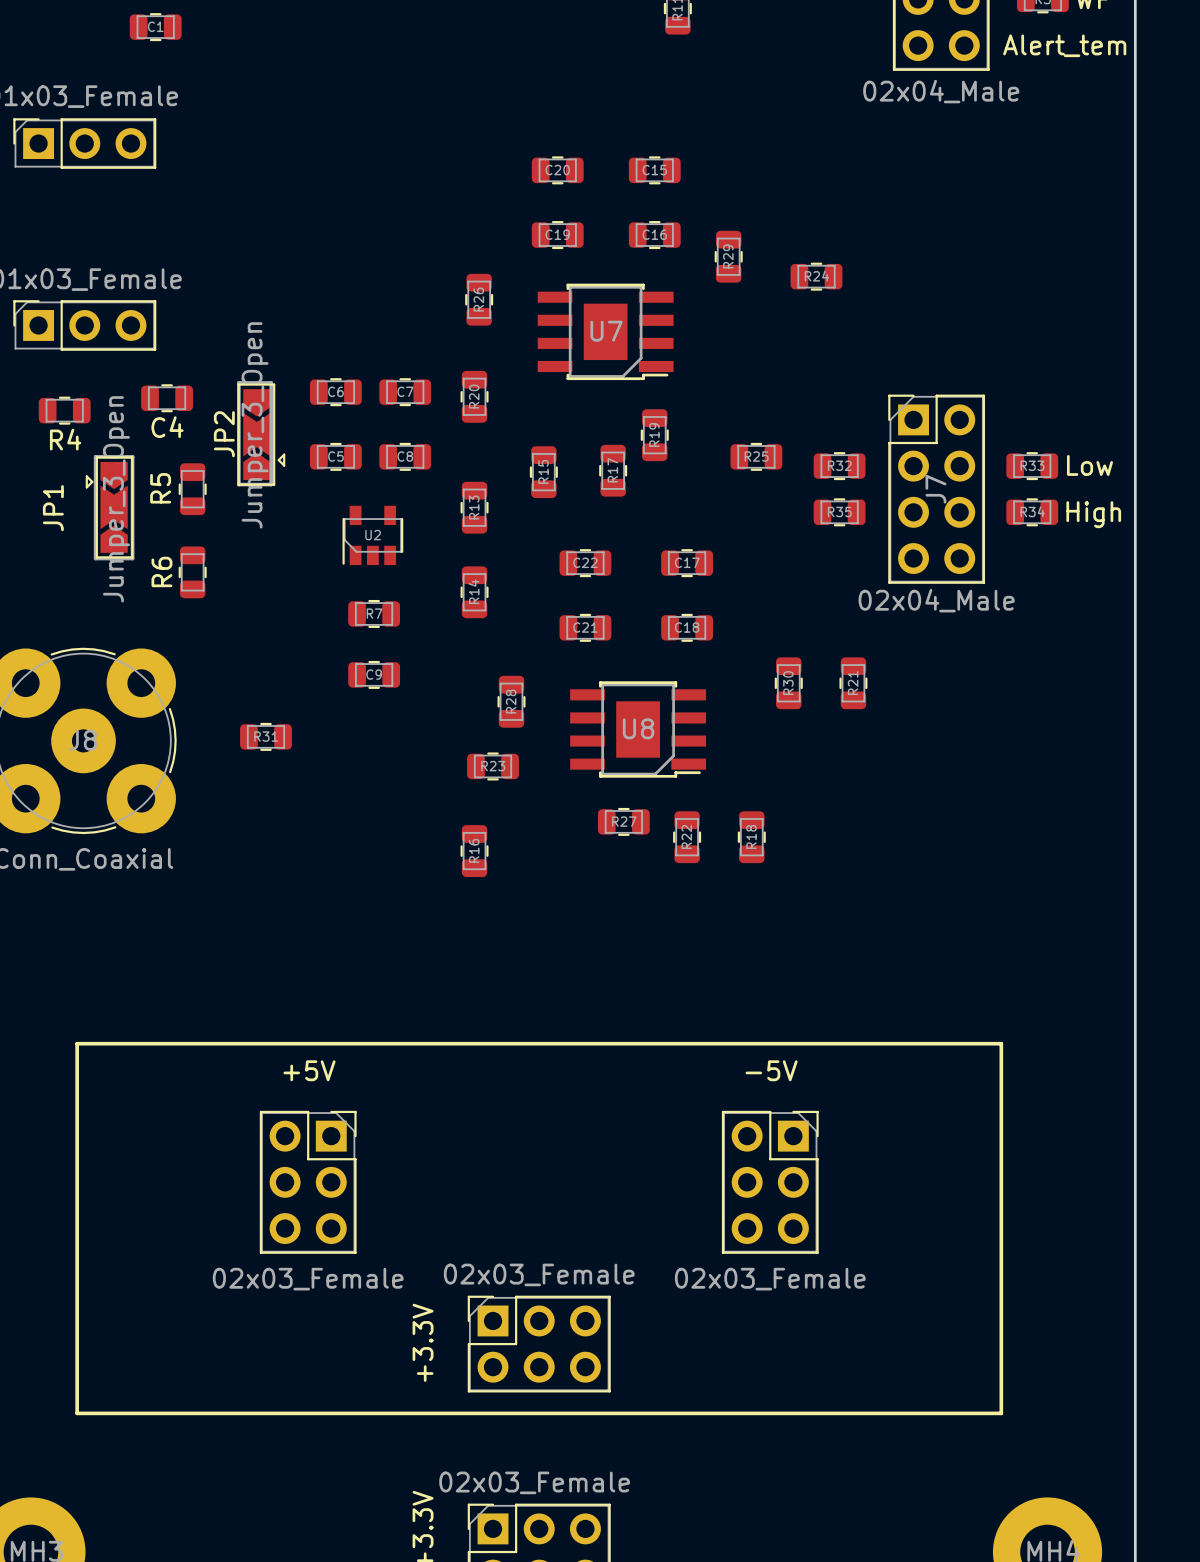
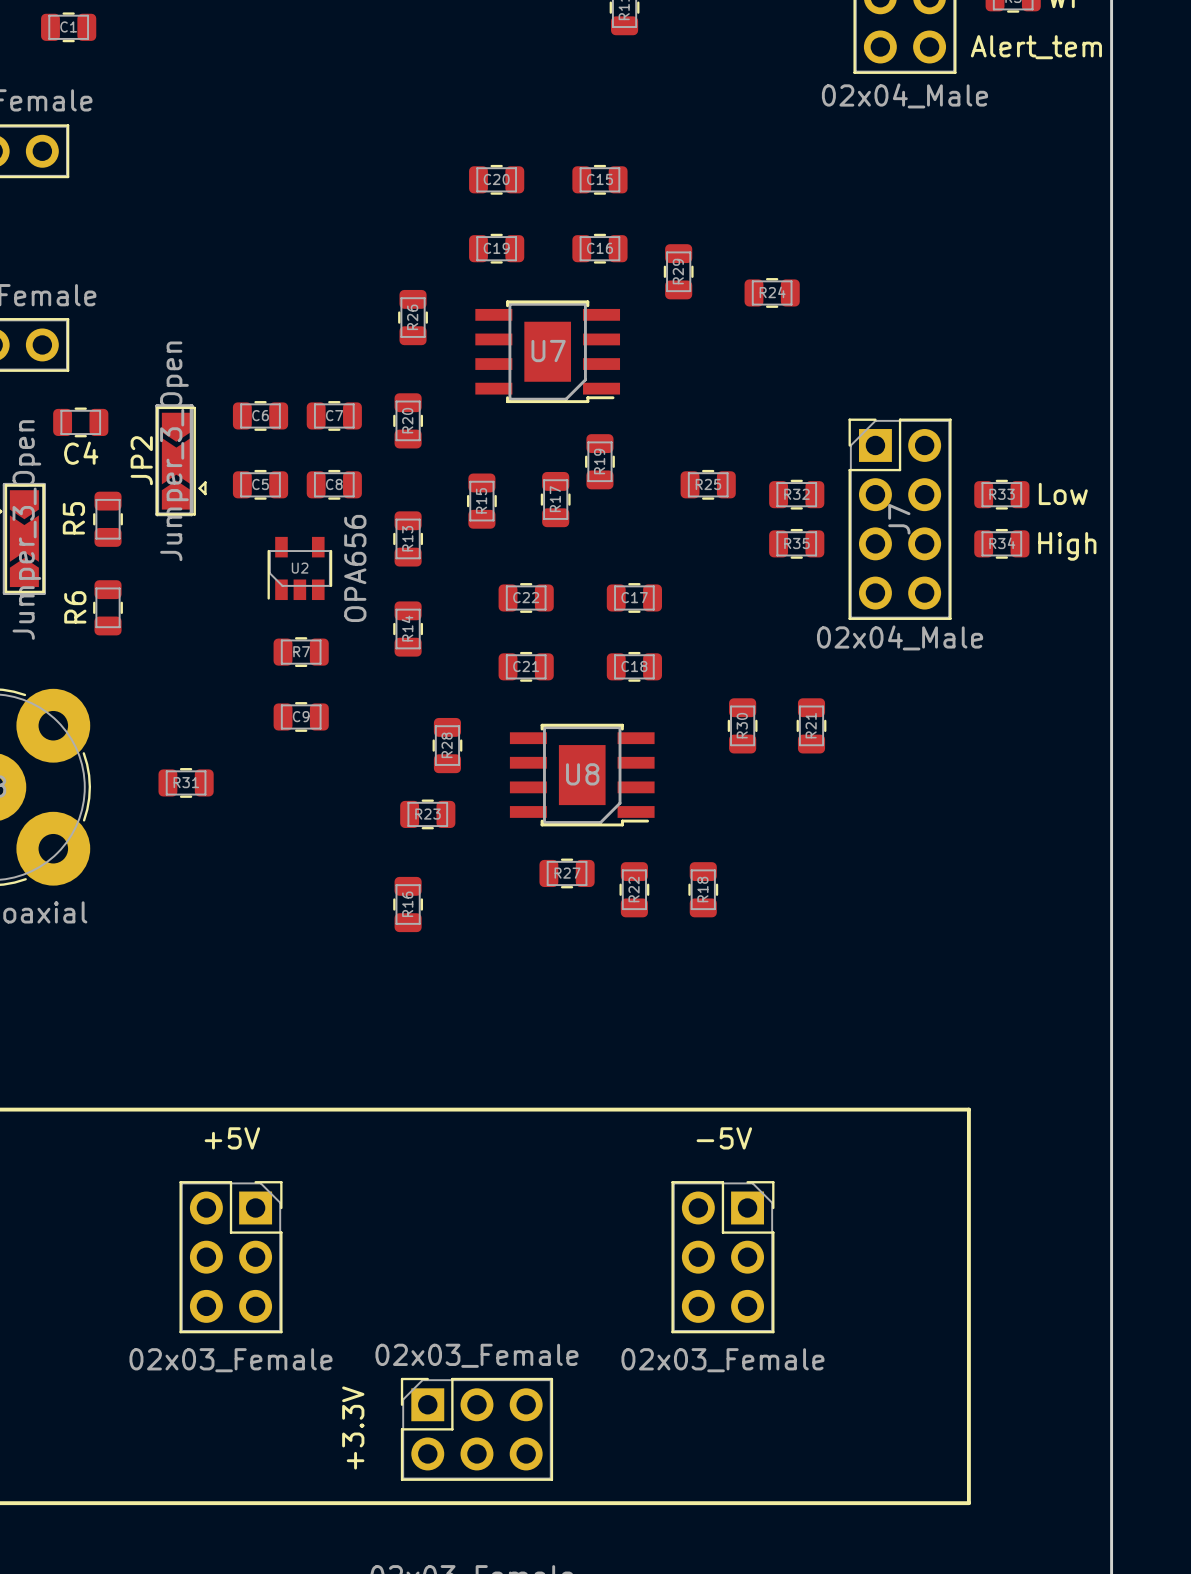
U2 value: none -> OPA656 (355, 568)

